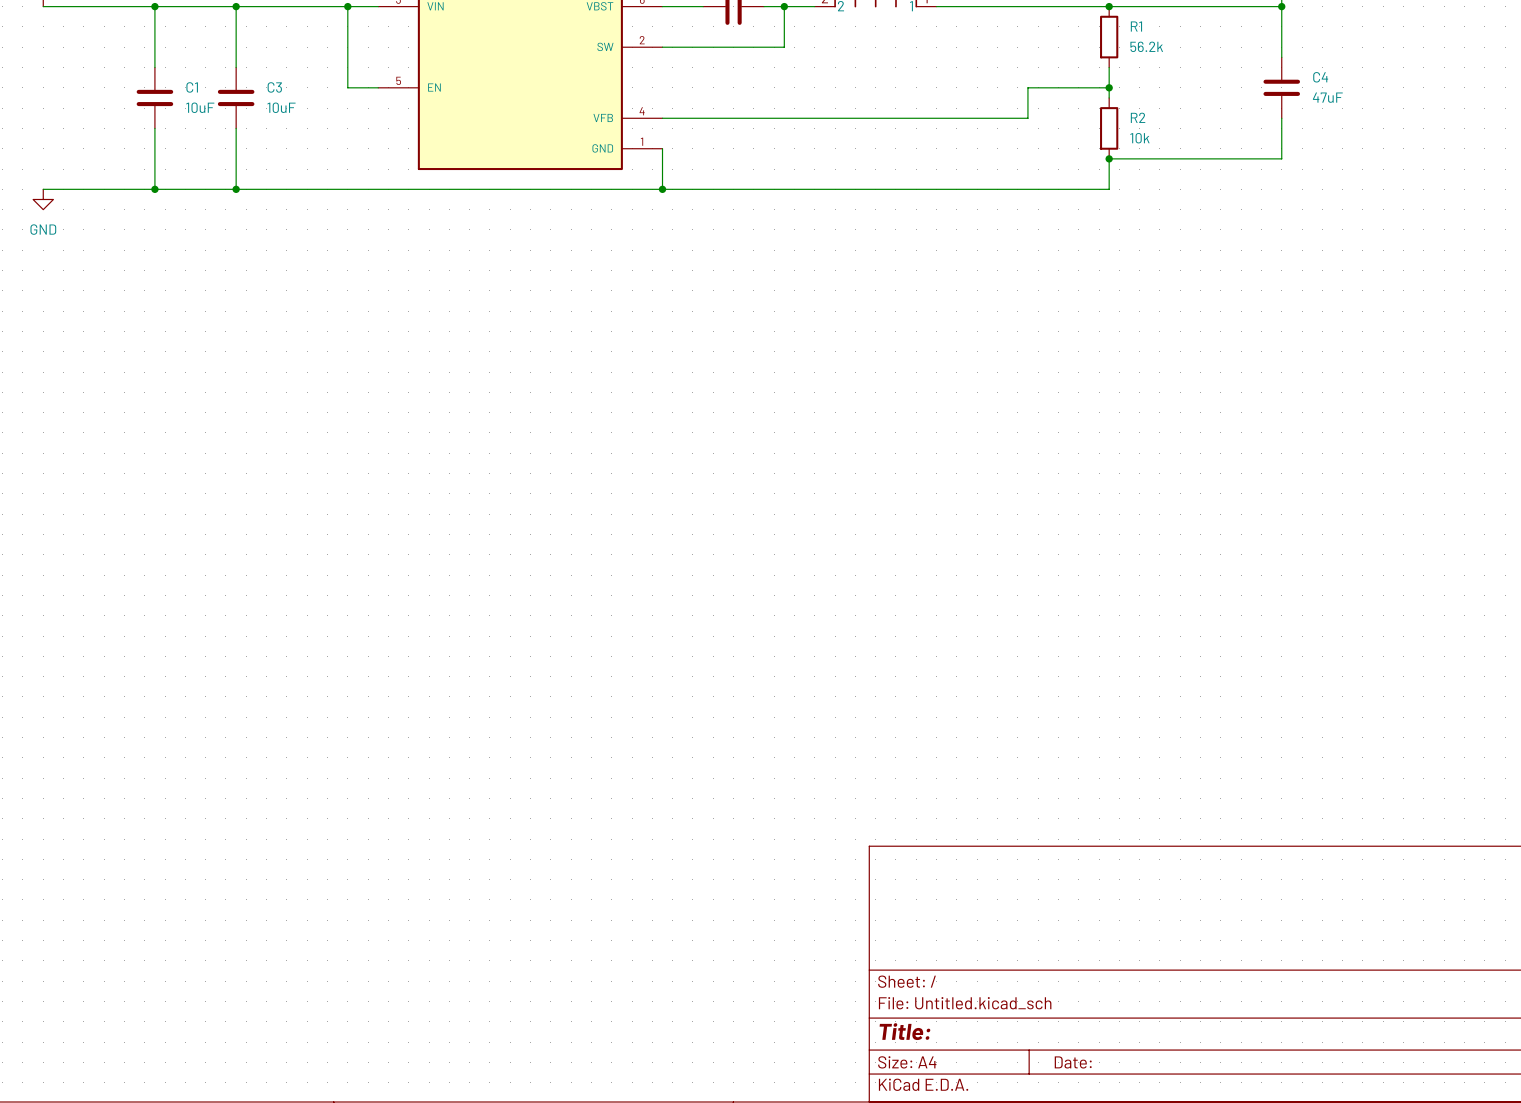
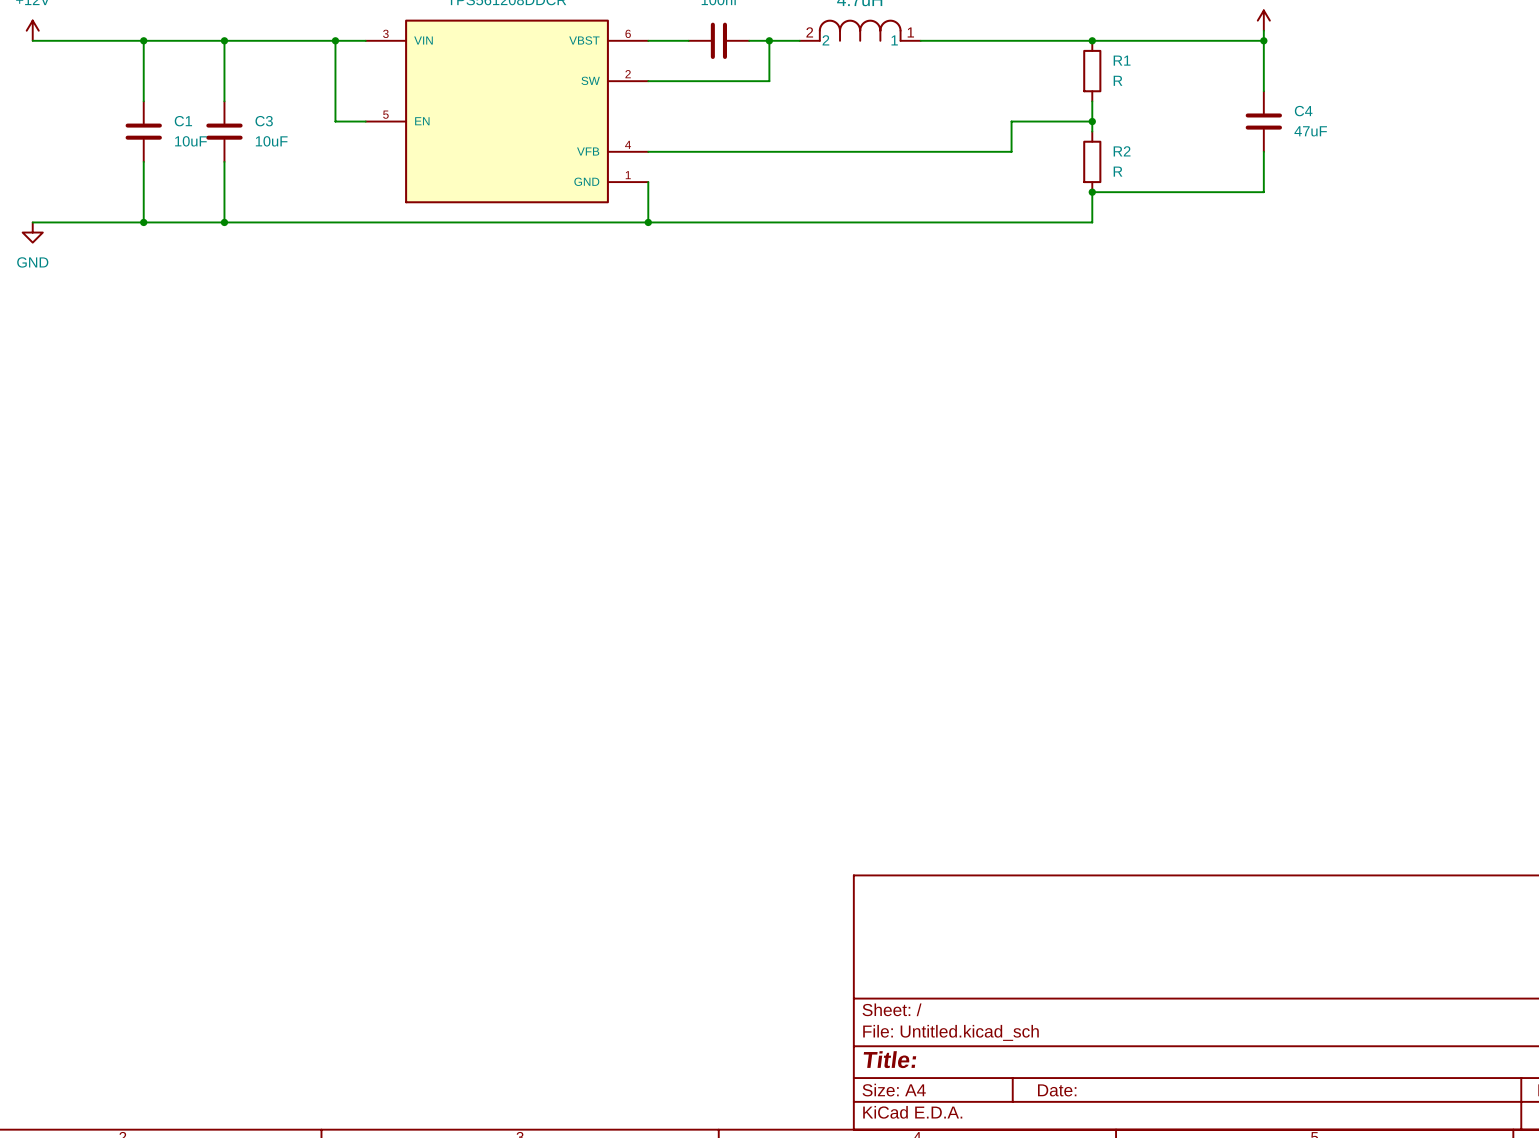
R1 value: 56.2k (1146, 46) -> R (1118, 80)
R2 value: 10k (1139, 138) -> R (1118, 171)

